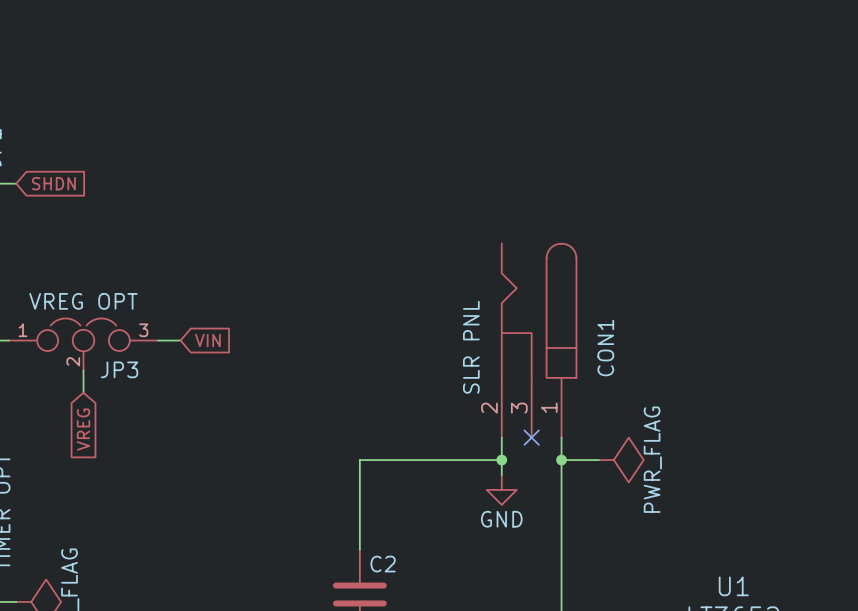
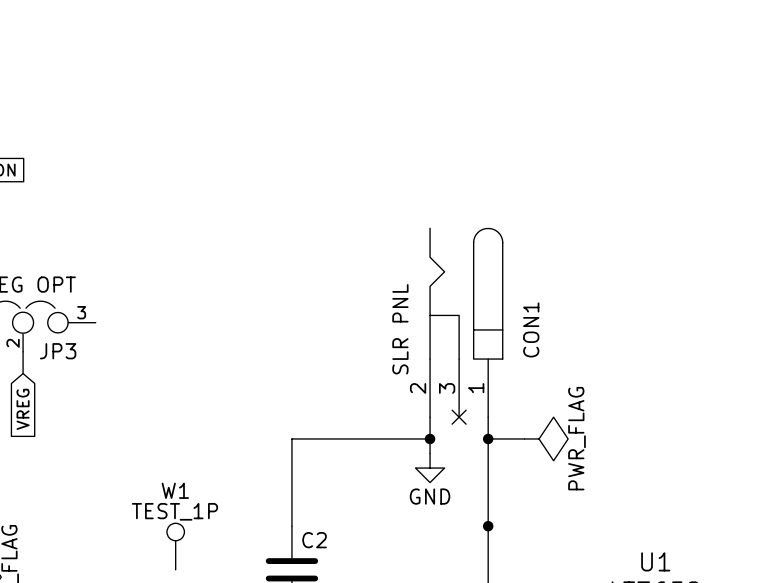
wire: (158, 340) (180, 340) -> none
global label: VIN (207, 340) -> none
junction: none -> (488, 526)
W1: none -> TEST_1P (175, 546)

